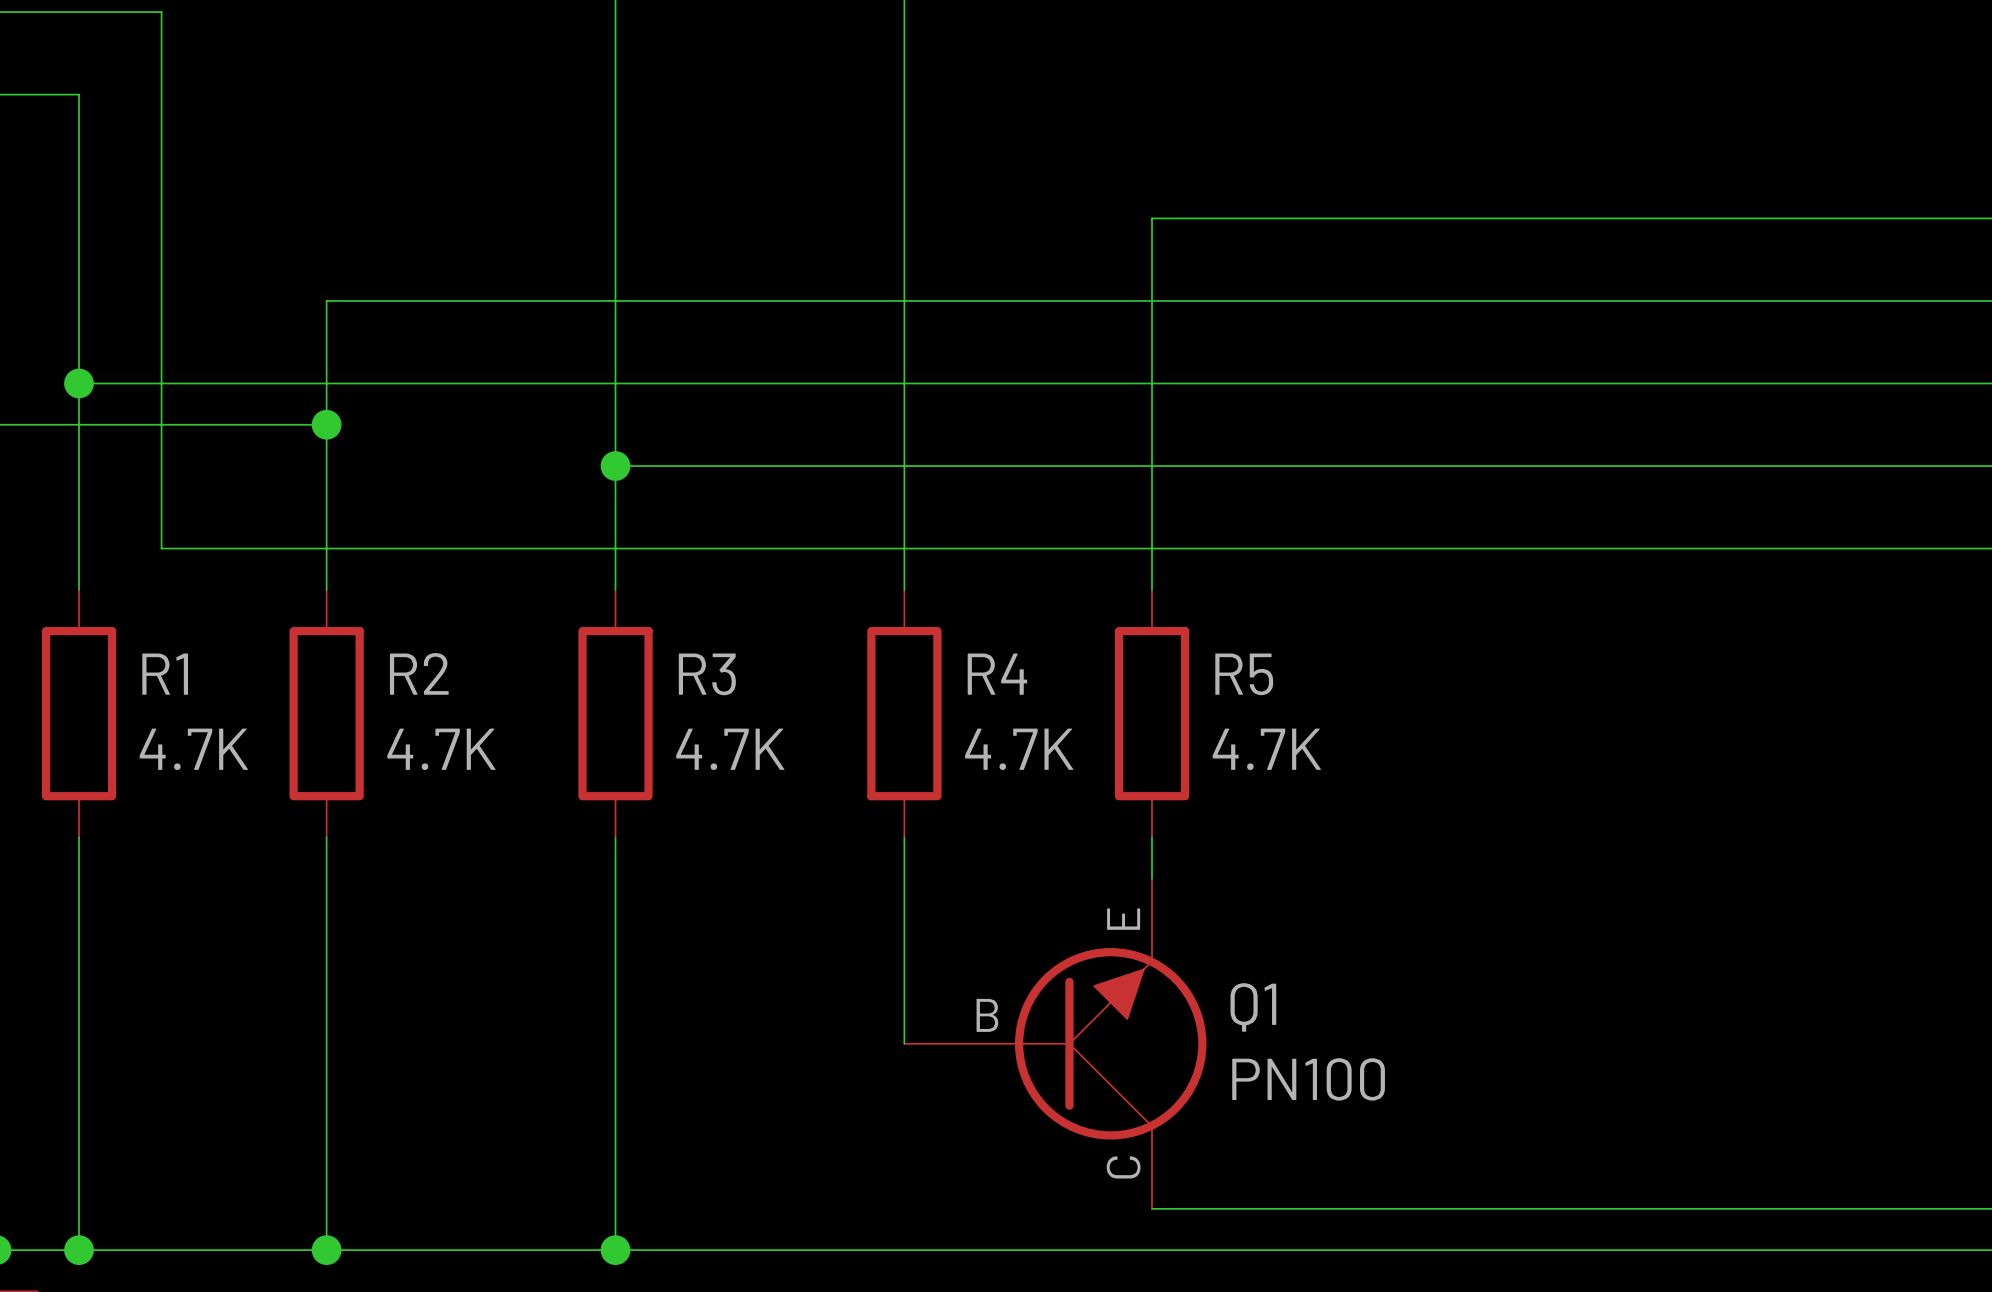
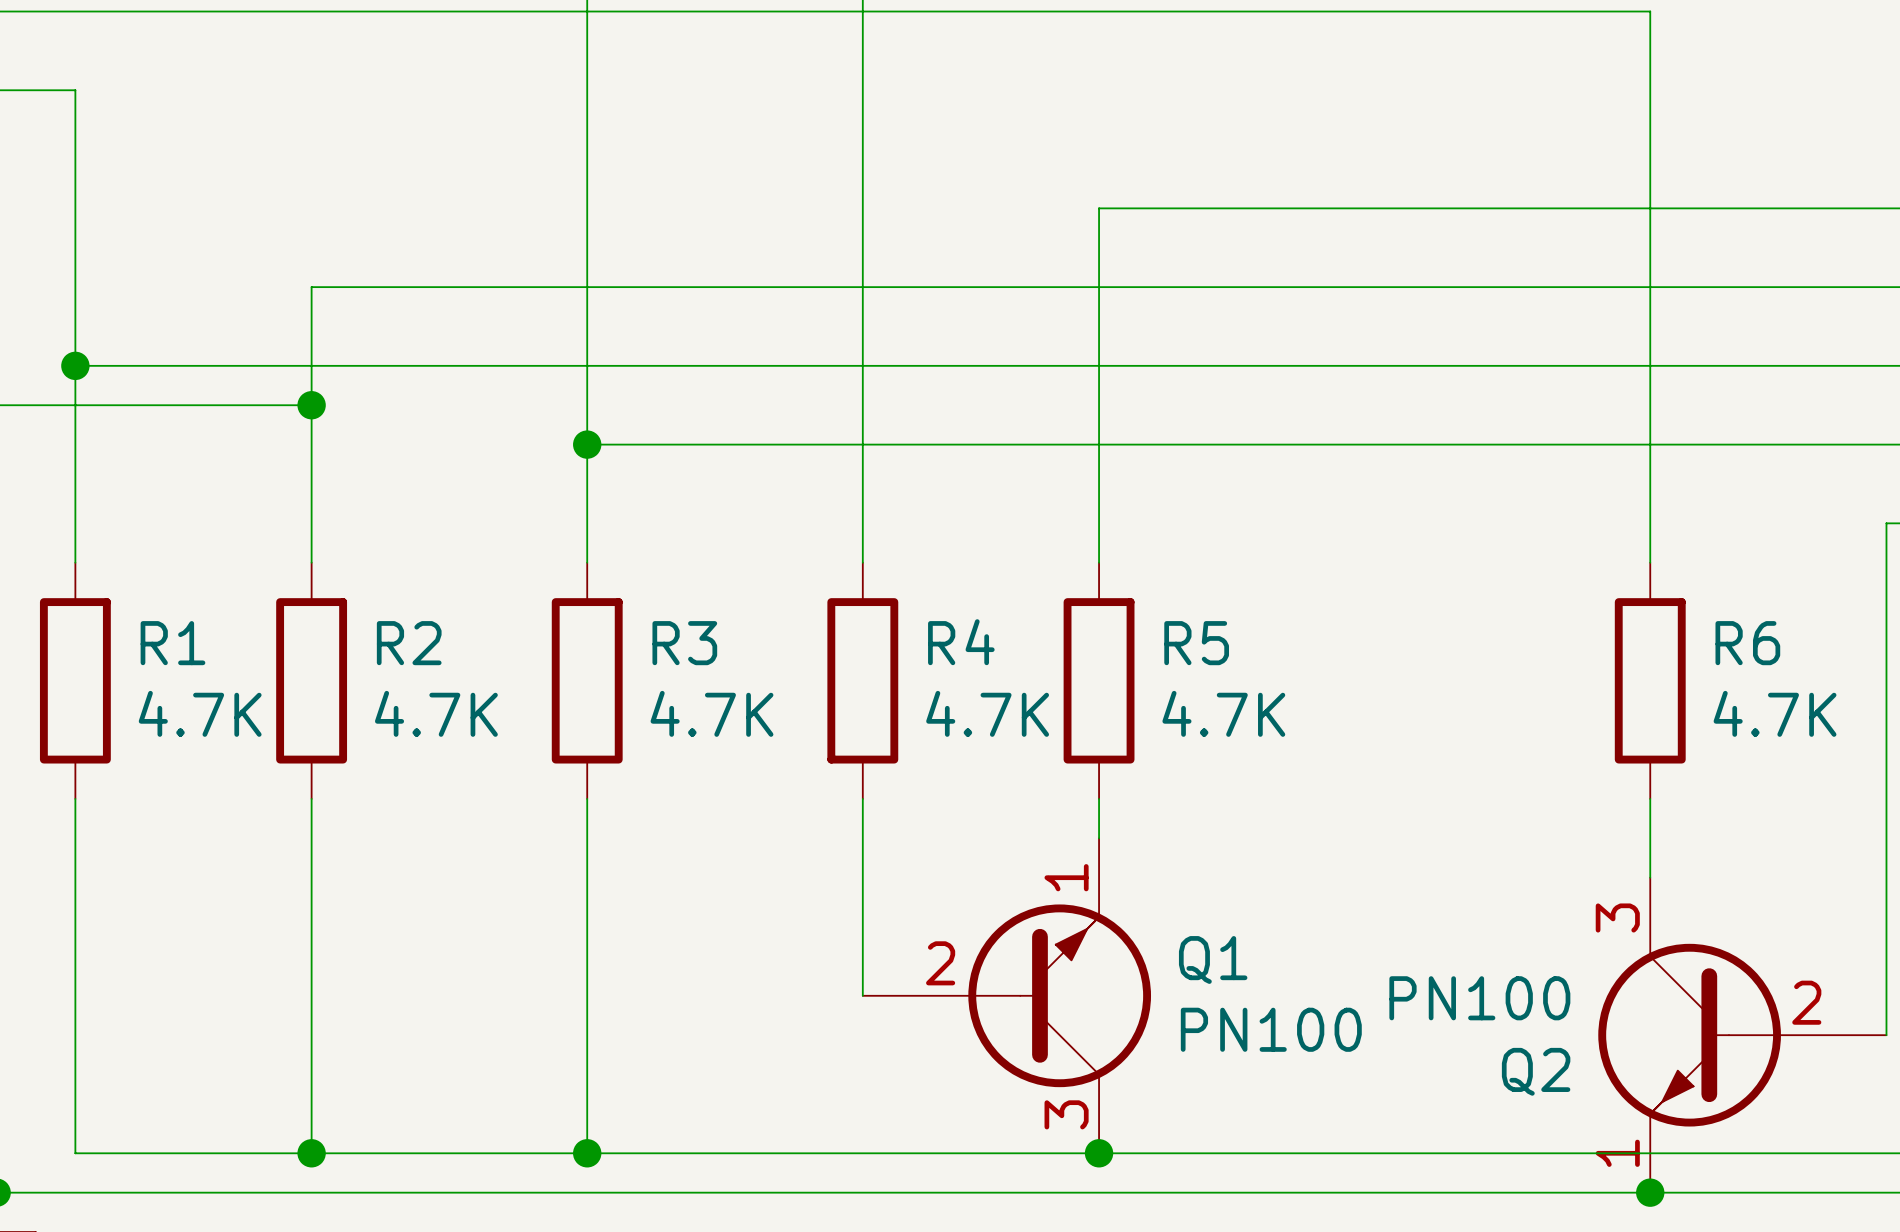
wire: (161, 12) (161, 548) (1977, 548) -> (154, 11) (1650, 11) (1650, 562)
wire: none -> (1886, 523) (1886, 1035)
R6: none -> 4.7K (1650, 680)
wire: none -> (1650, 798) (1650, 877)
Q1 symbol: [904, 878, 1207, 1209] -> [862, 838, 1152, 1154]
Q2: none -> PN100 (1742, 1035)
wire: (79, 1208) (79, 1250) -> (75, 1153) (1099, 1153)
wire: (326, 1208) (326, 1250) -> none
wire: (615, 1208) (615, 1250) -> none
junction: none -> (1099, 1153)
junction: (79, 1250) -> none
junction position: (326, 1250) -> (311, 1153)
junction position: (615, 1250) -> (587, 1153)
junction: none -> (1650, 1192)

